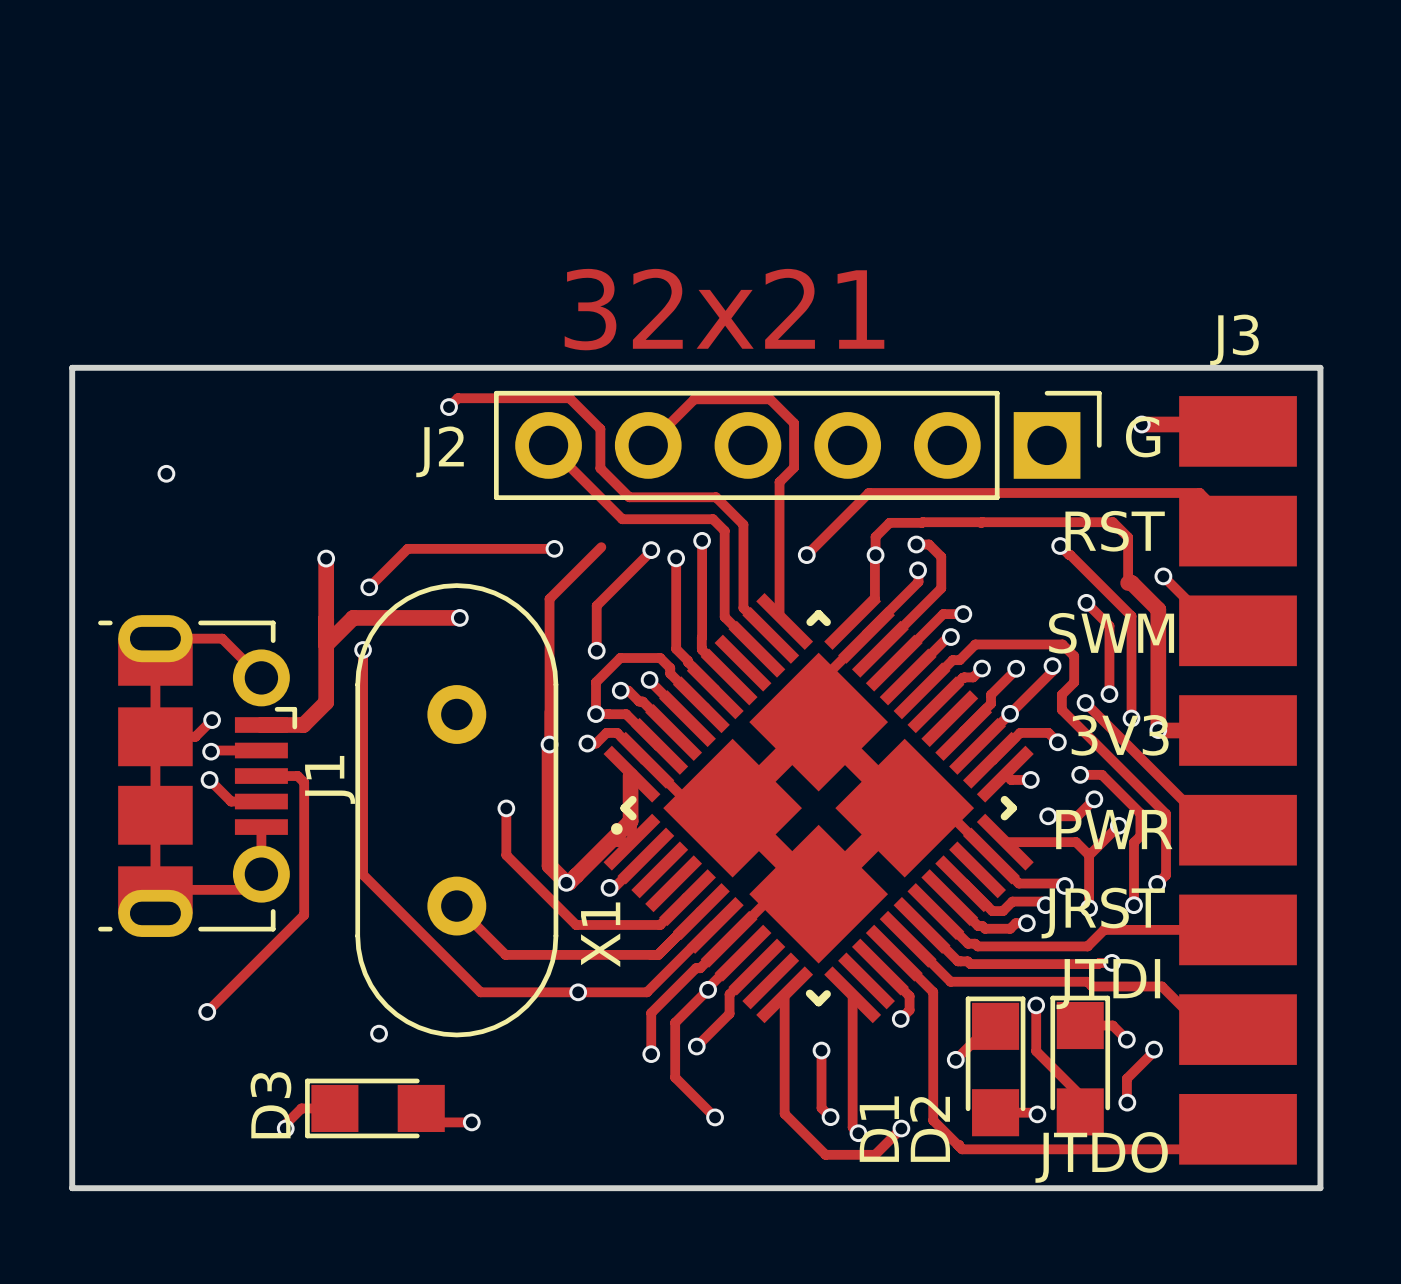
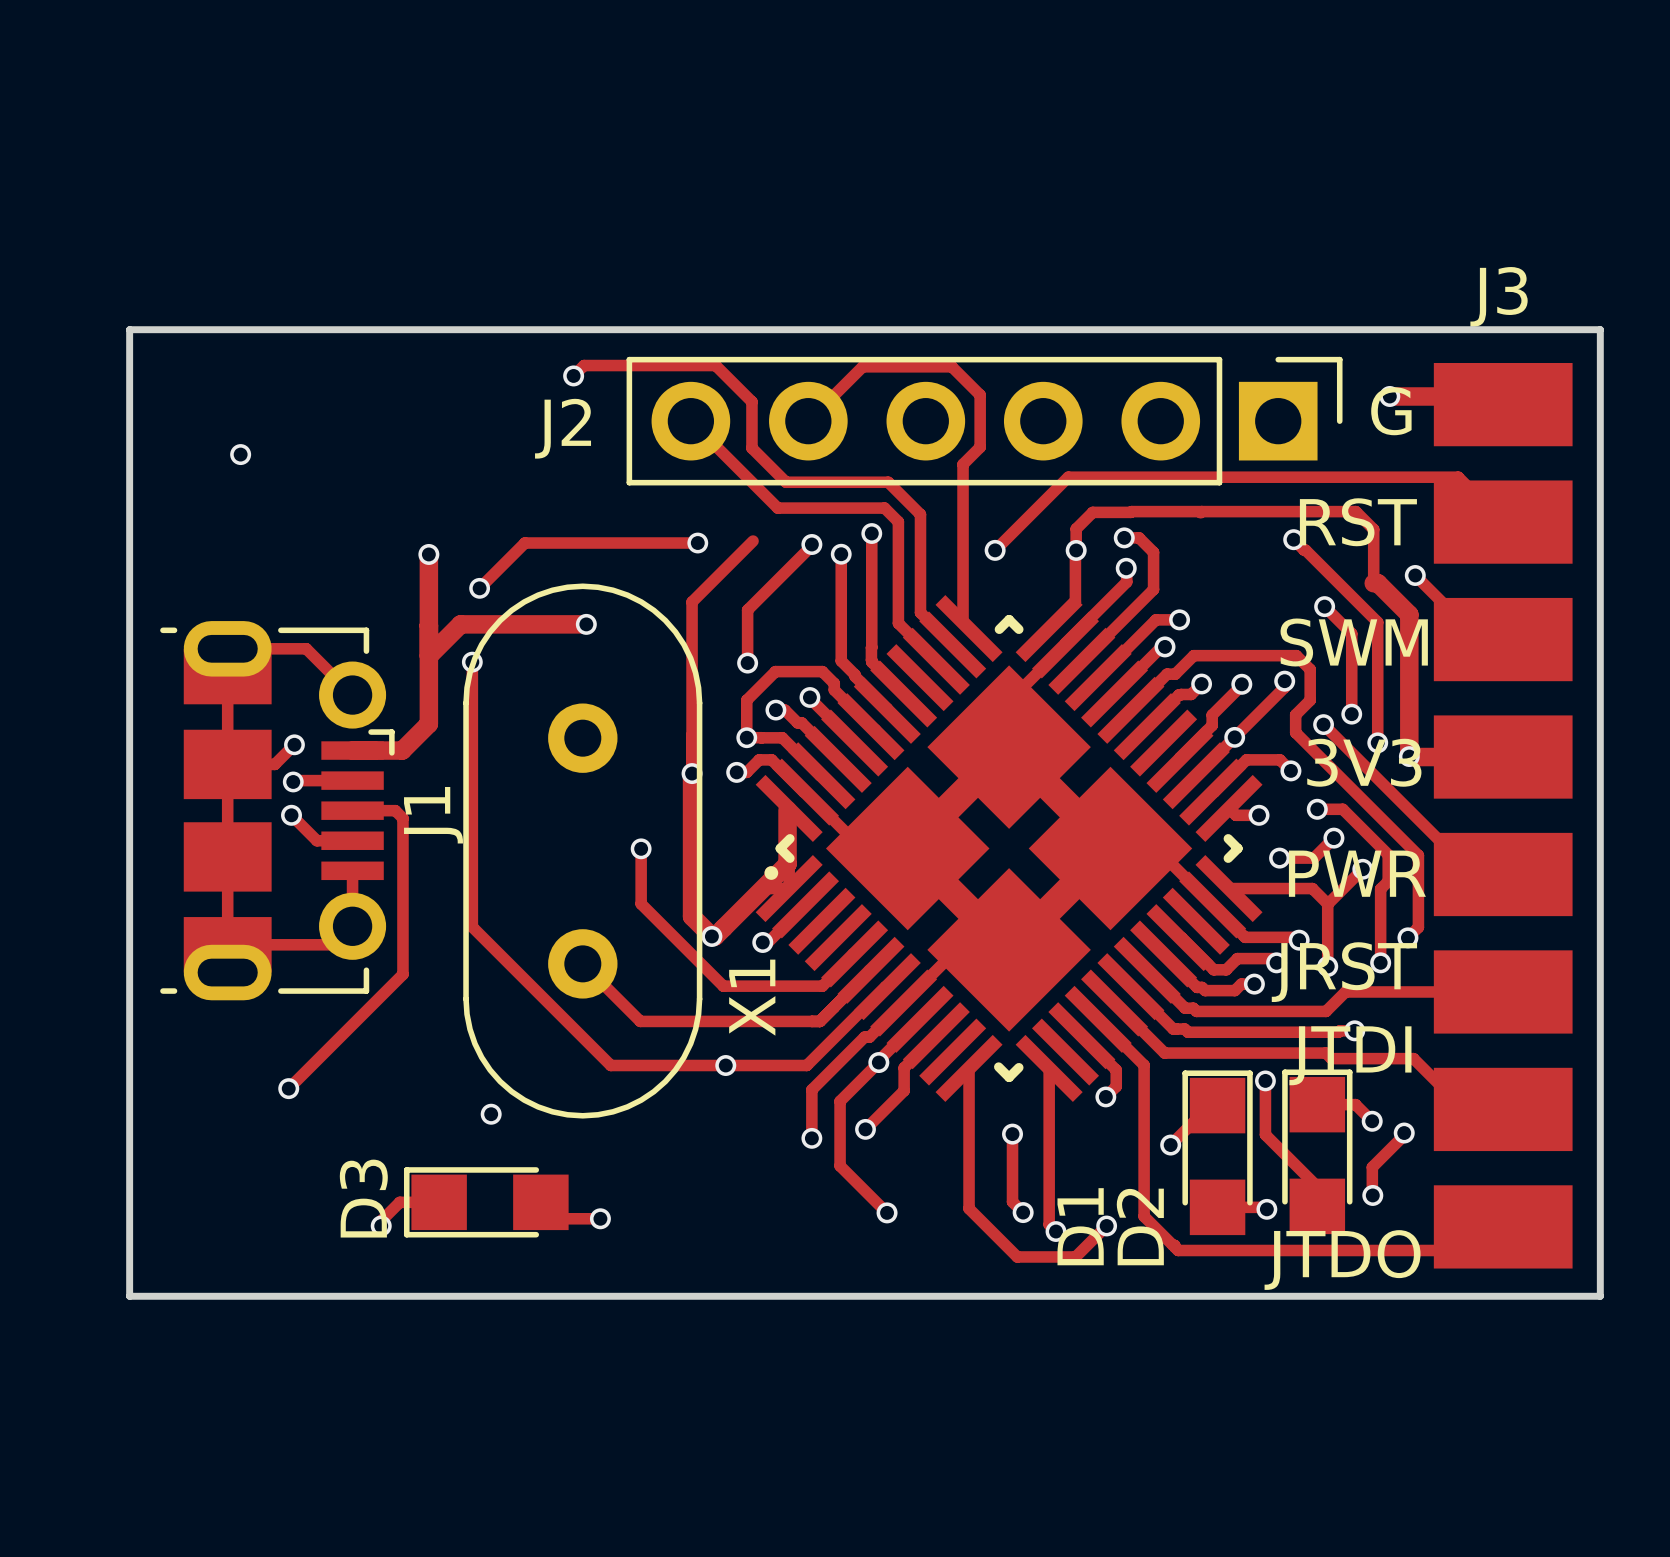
text: 32x21 (724, 309) -> none

